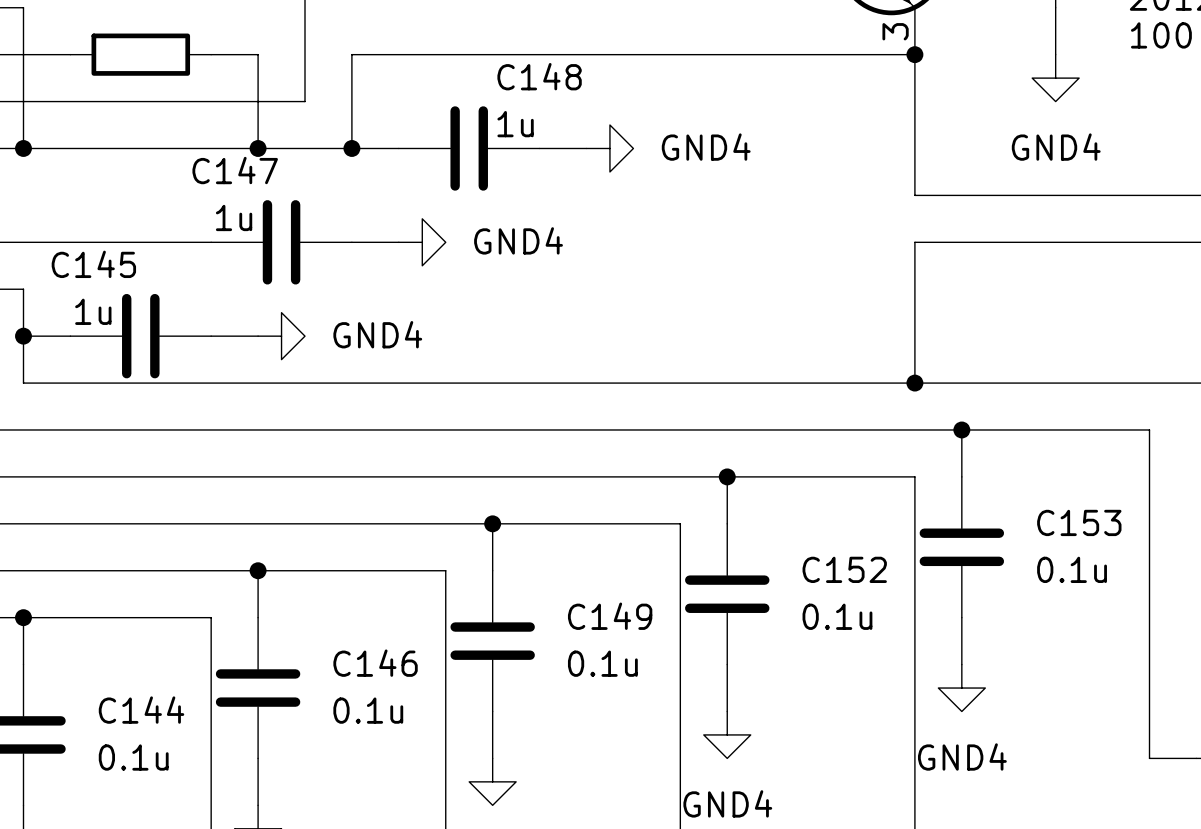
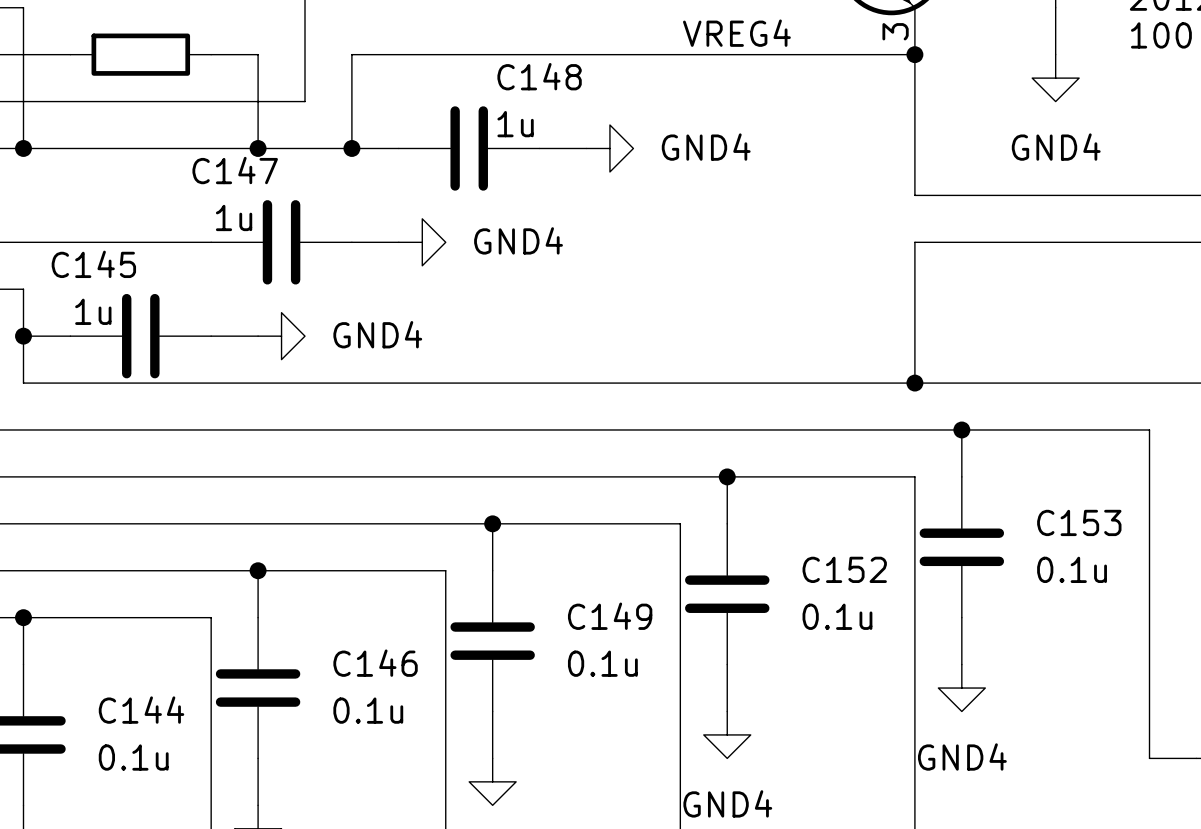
label: none -> VREG4 (736, 33)

